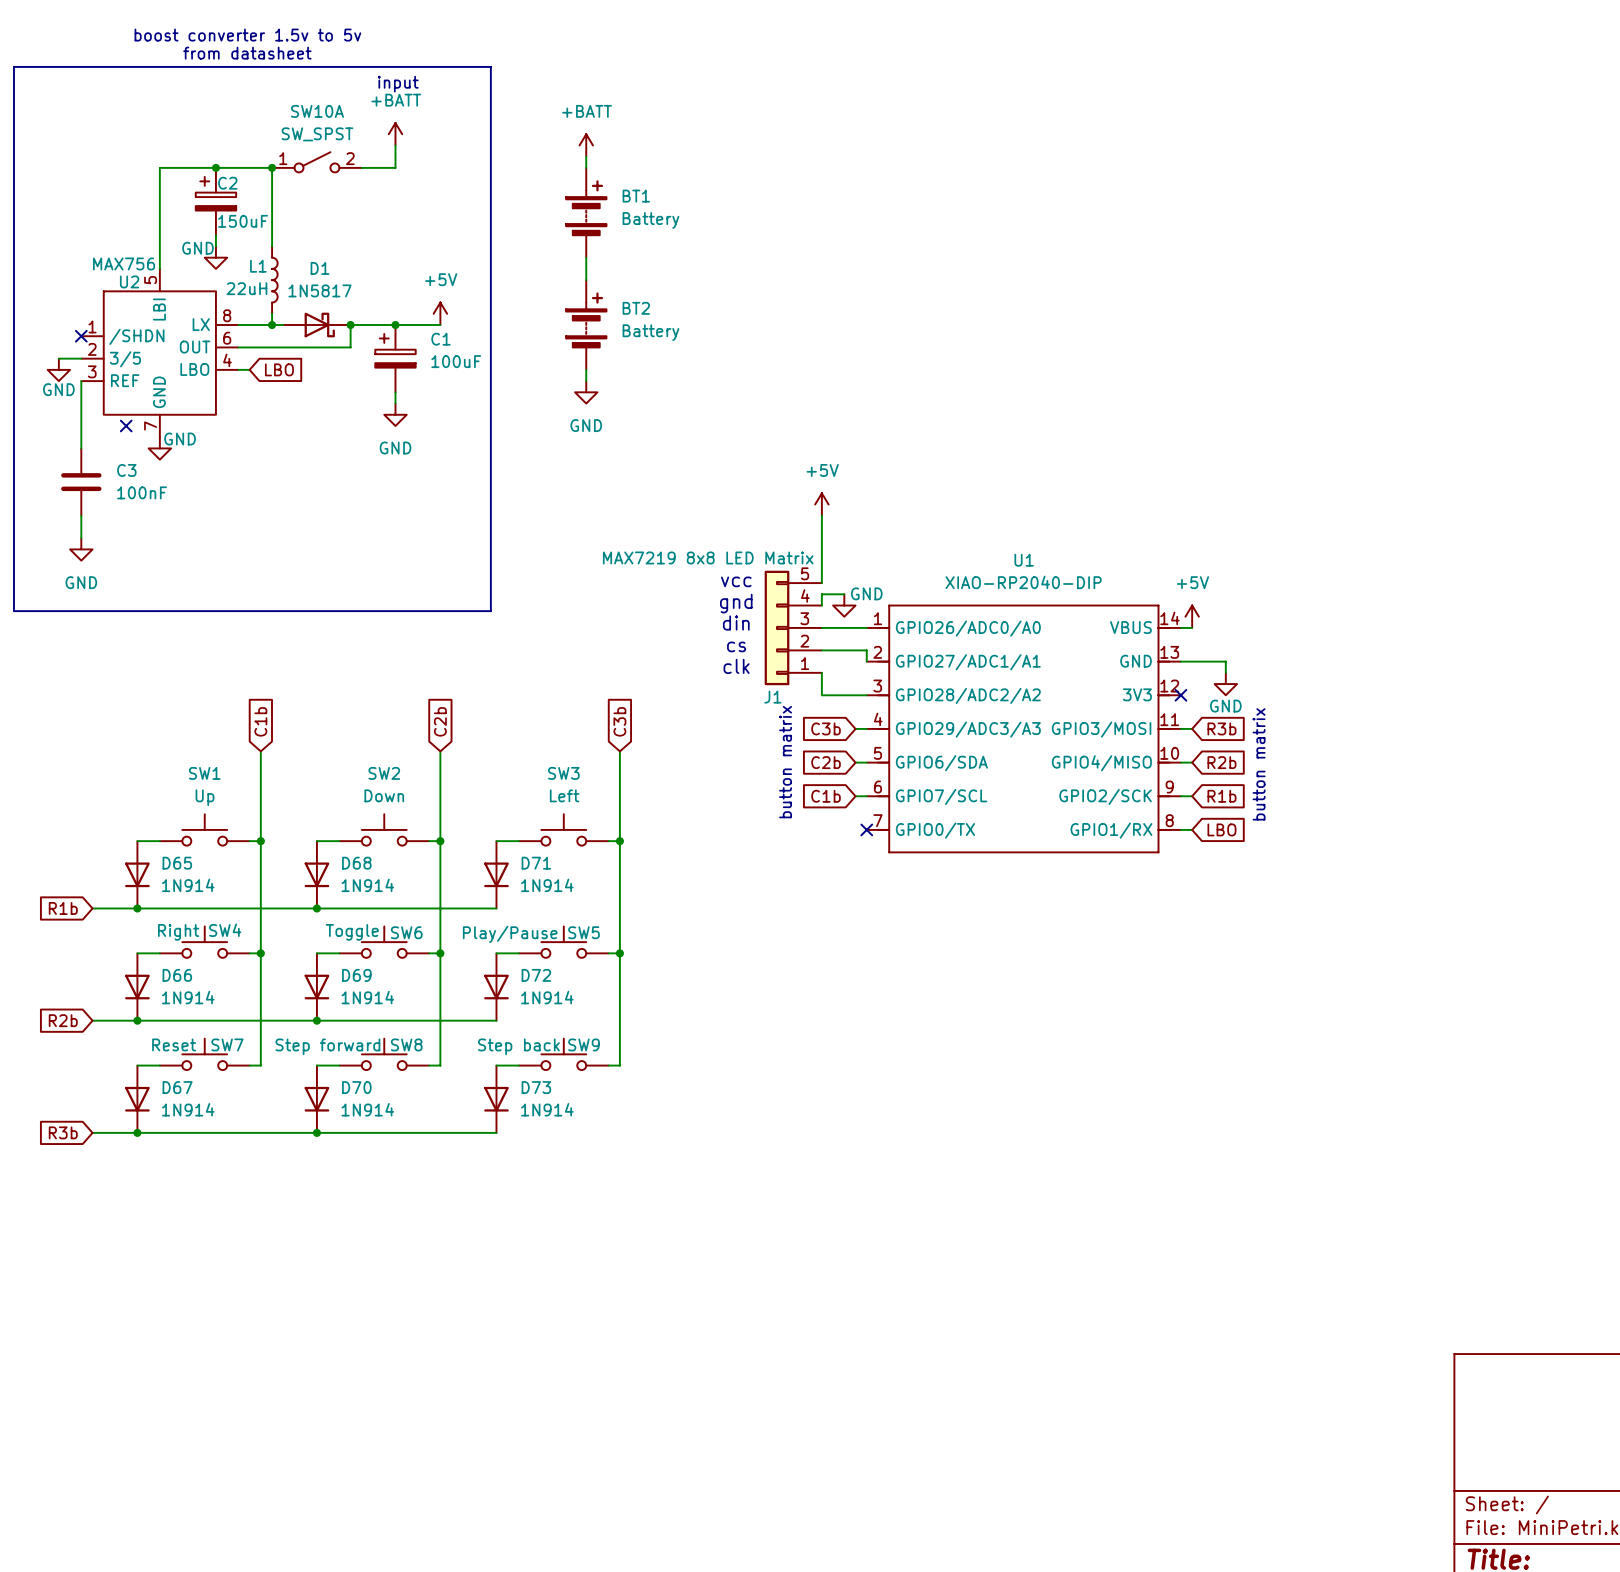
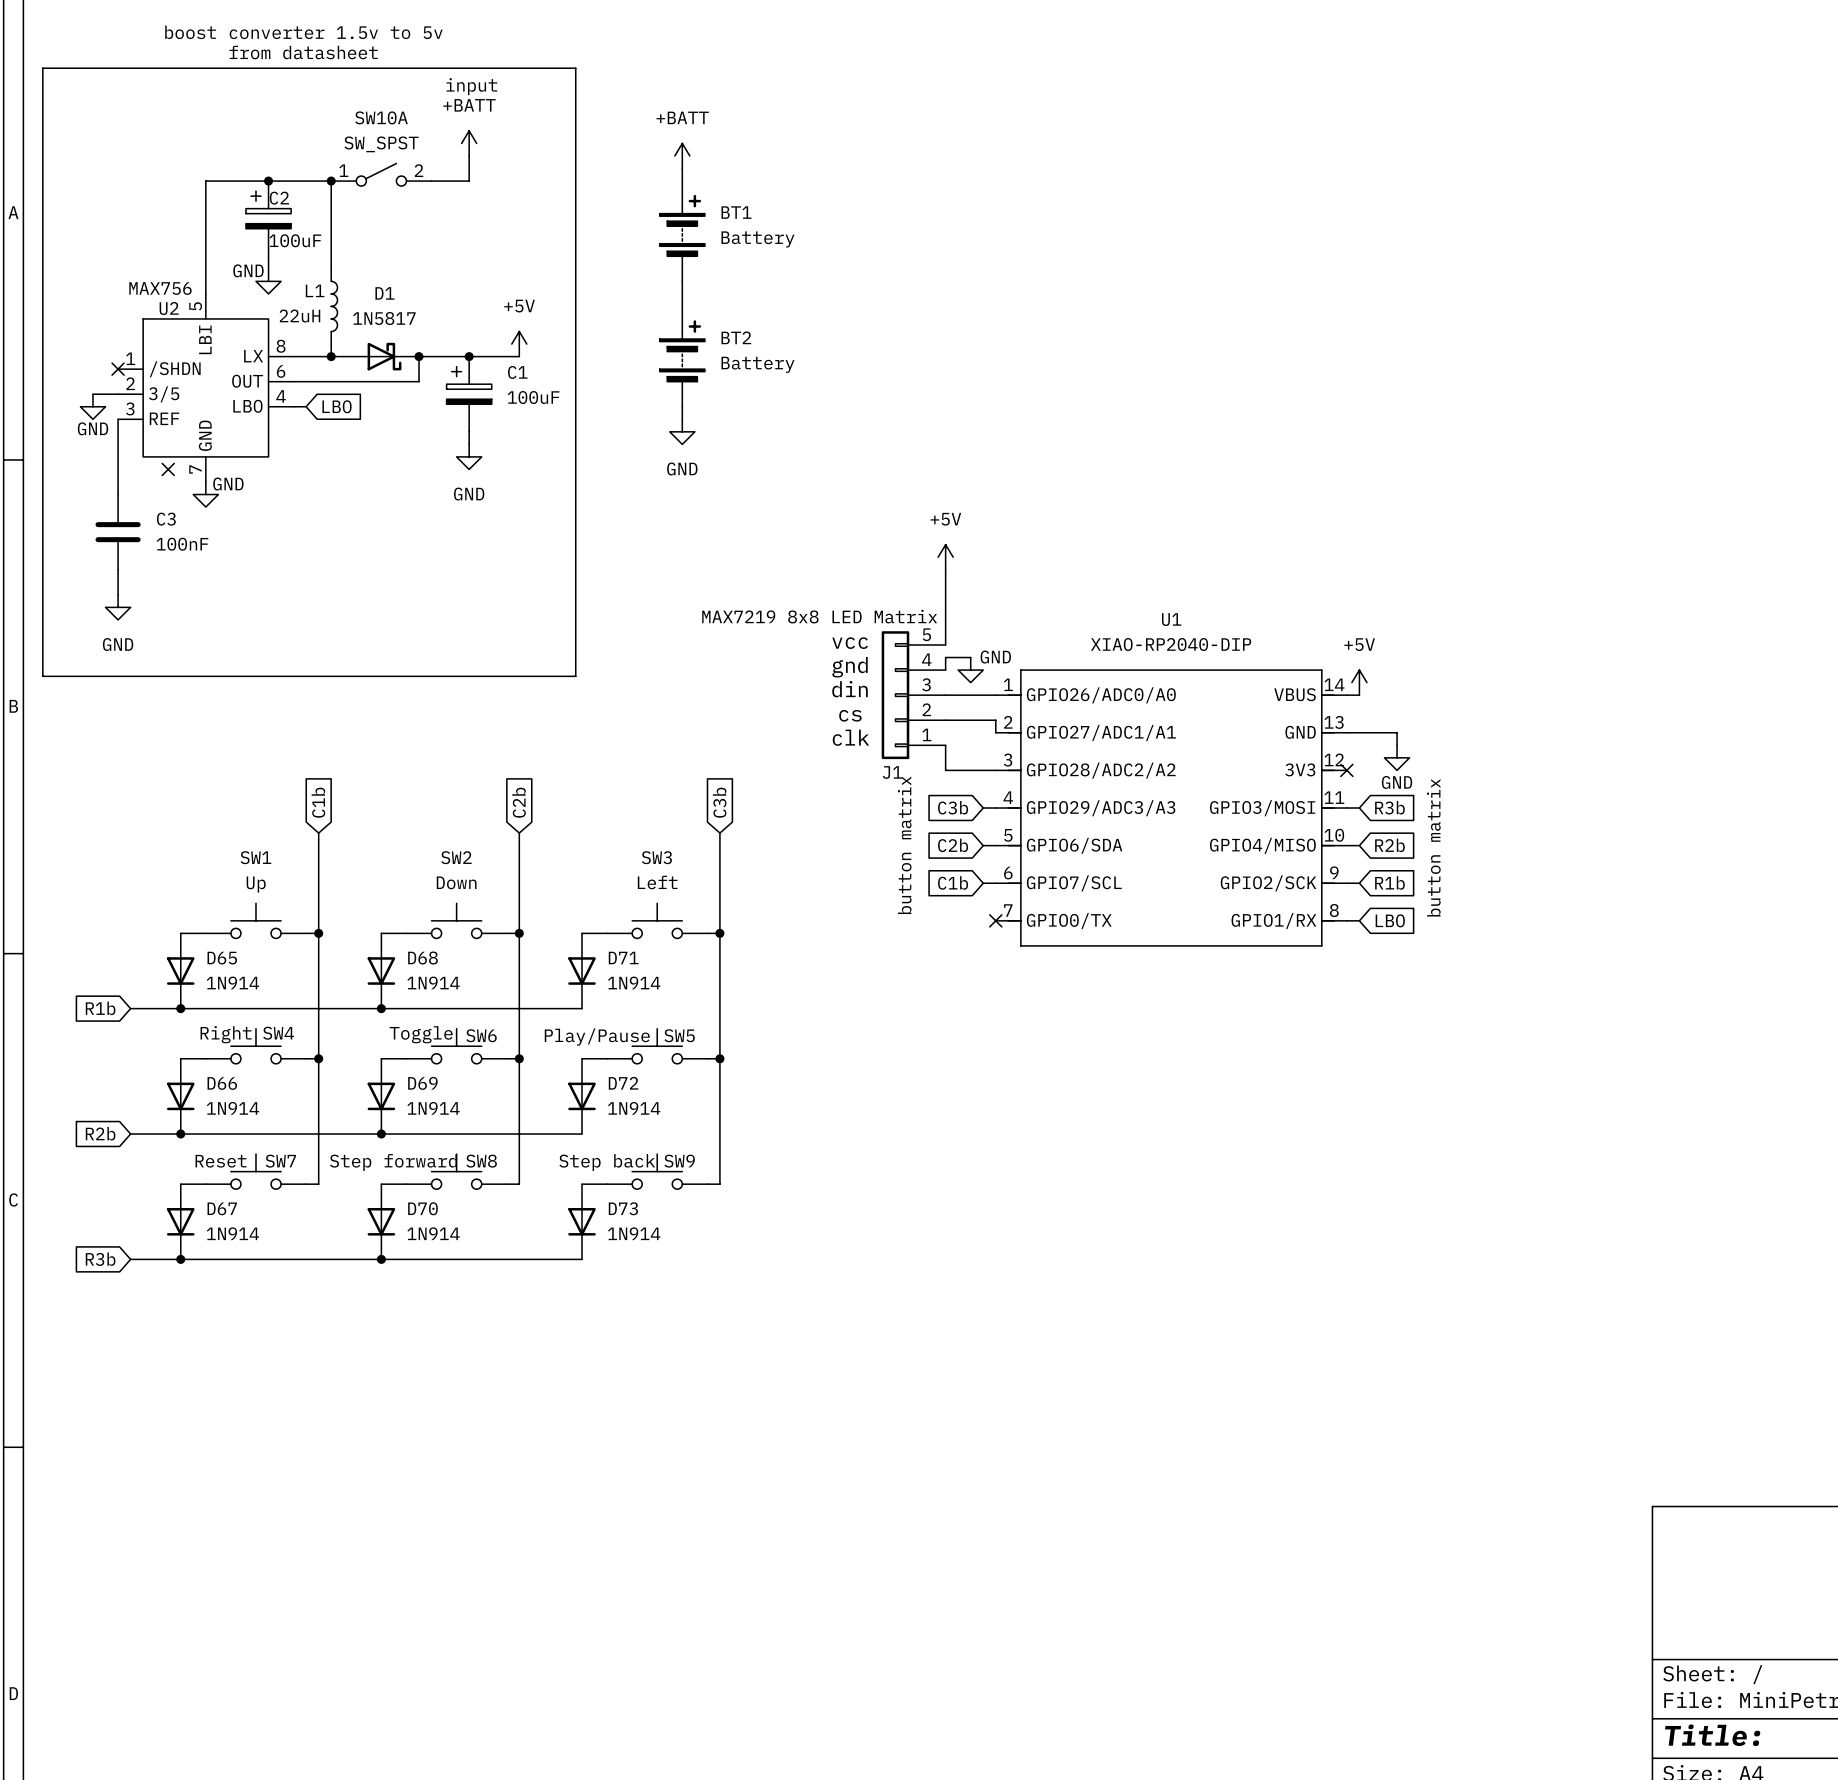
C2 value: 150uF (243, 221) -> 100uF (295, 240)

